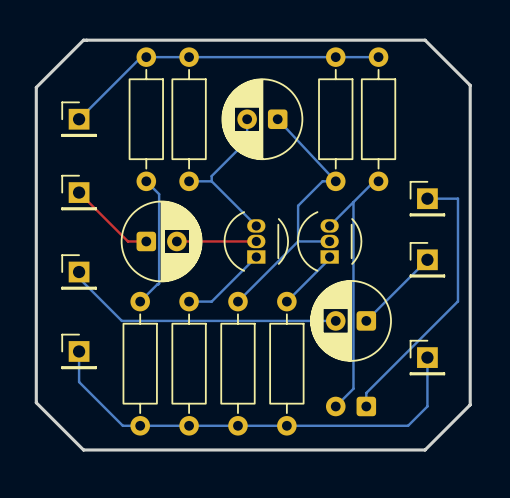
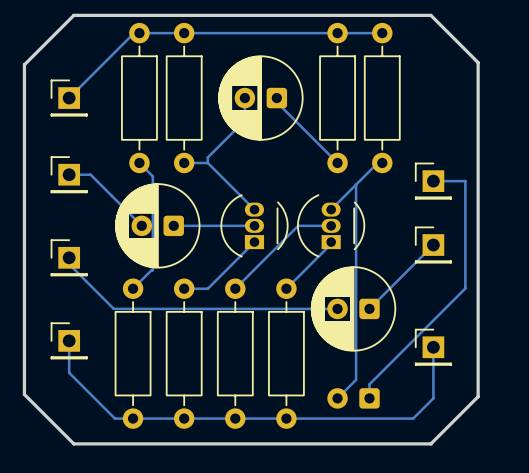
bottom track: (277, 119) (335, 181) (335, 186) (330, 181) (322, 181) (298, 205) (298, 241) -> (276, 98) (276, 102) (337, 162)
bottom track: none -> (69, 174) (90, 174) (141, 225)
top track: (79, 192) (127, 241) (146, 241) -> none
part rotation: 0° (161, 241) -> 180° (157, 225)
top track: (176, 241) (256, 241) -> none
bottom track: none -> (173, 225) (254, 225)

